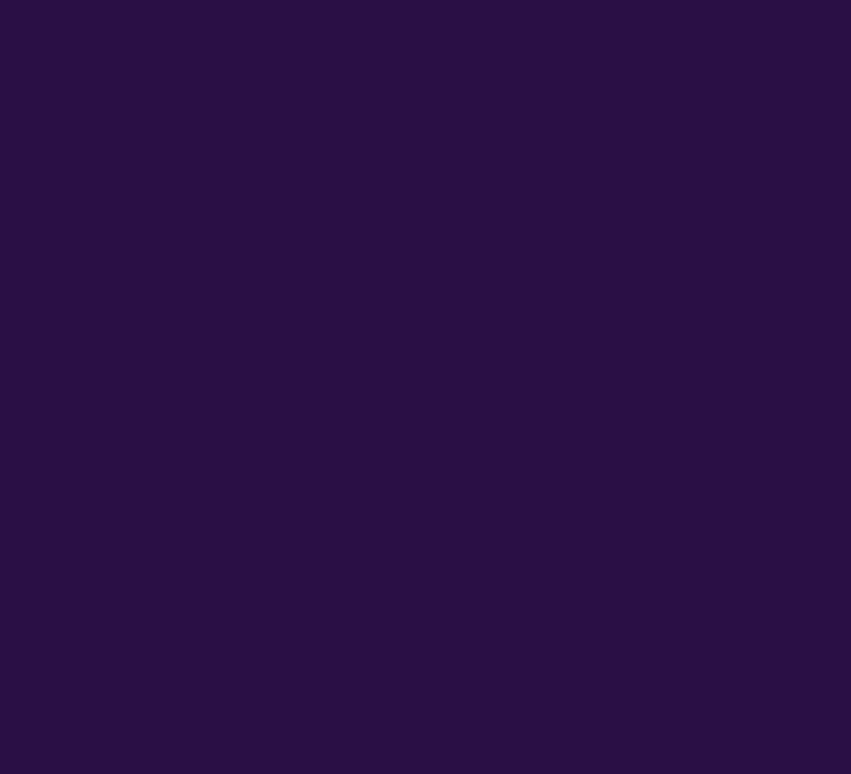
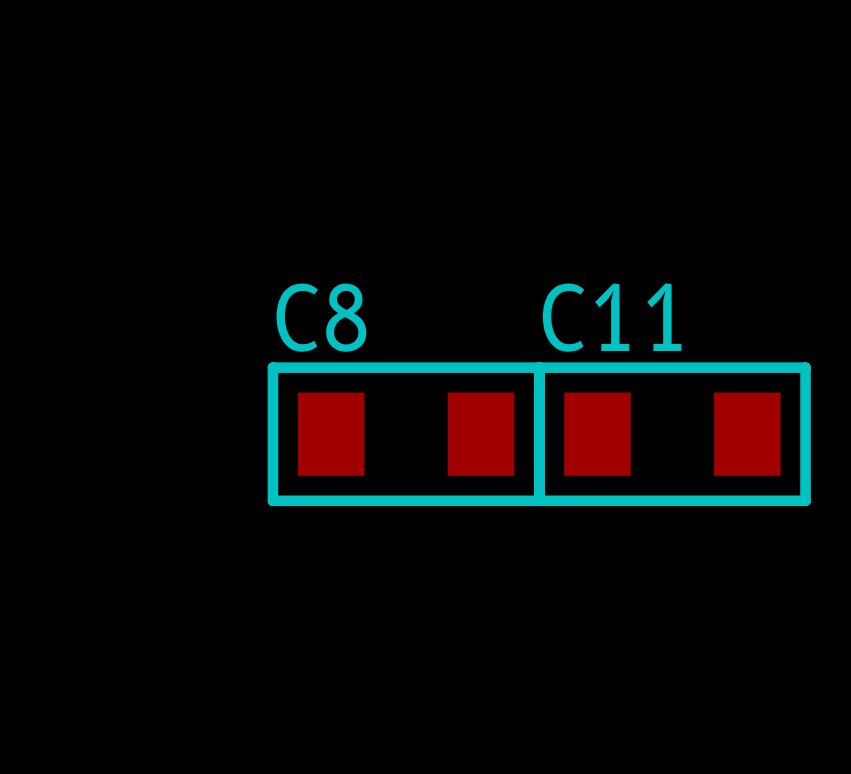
C8: none -> (406, 434)
C11: none -> (672, 434)

